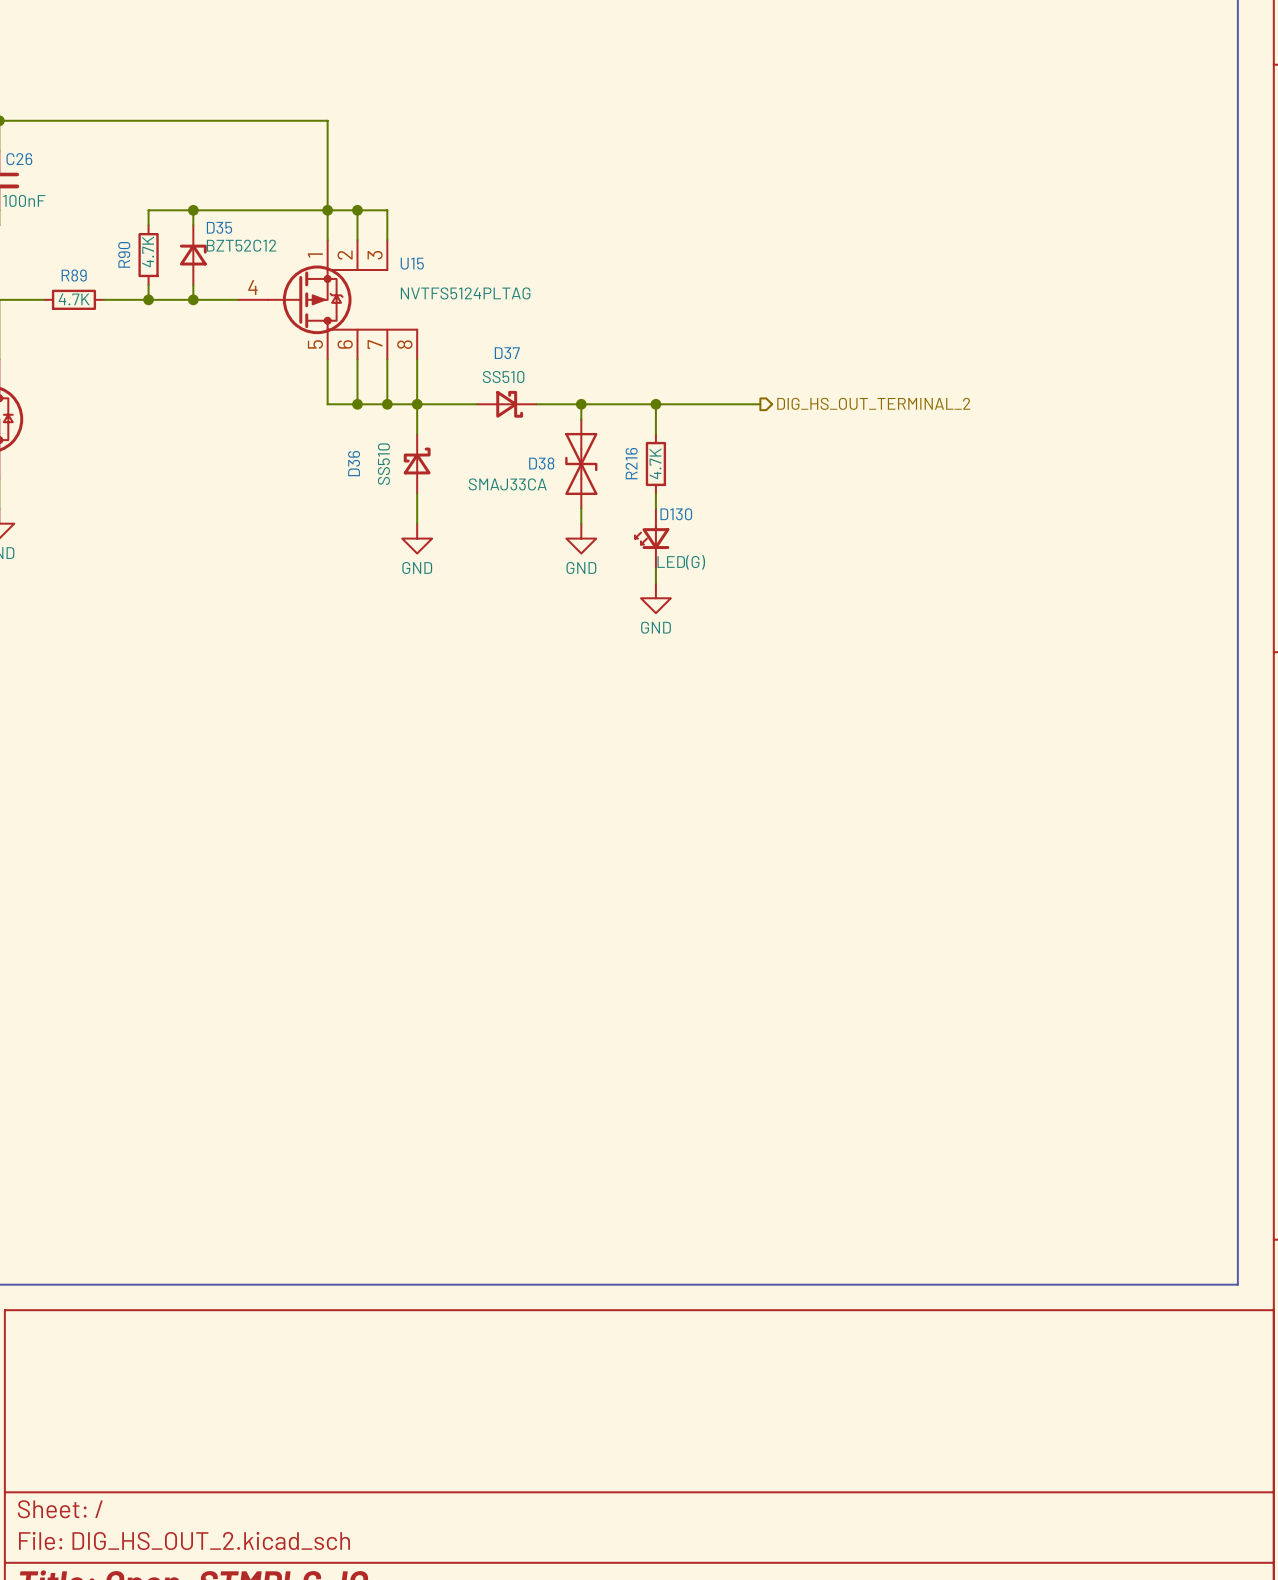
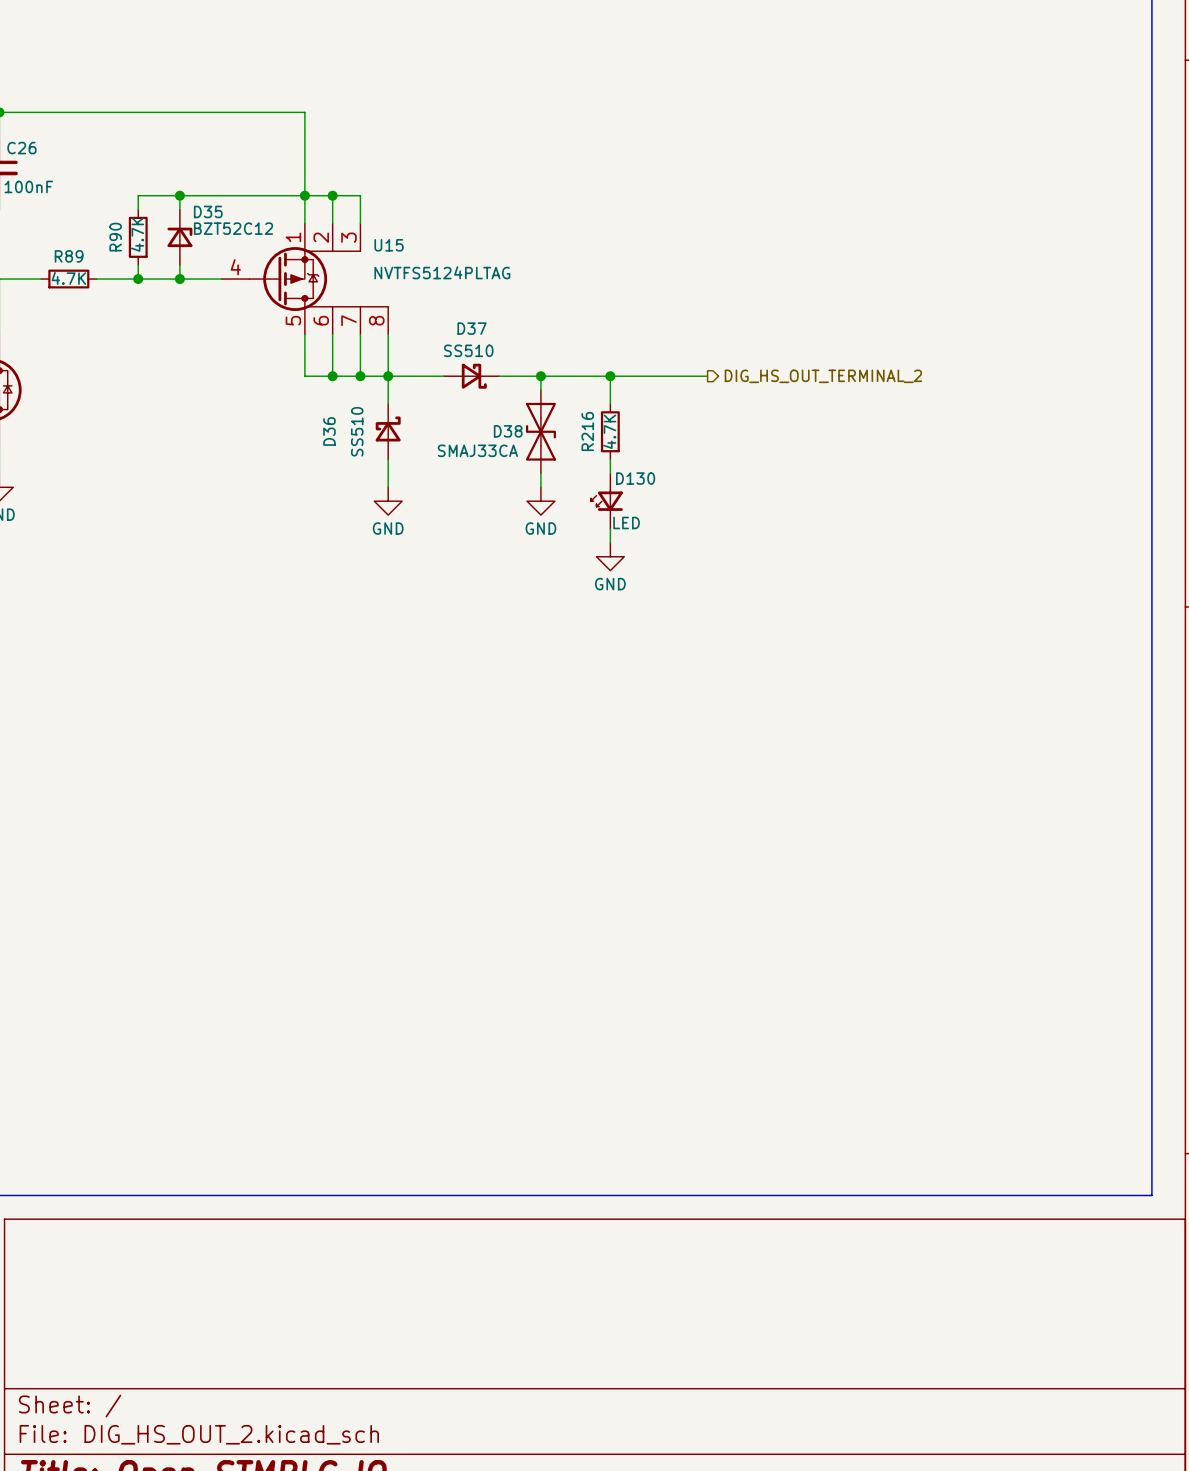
D130 value: LED(G) (681, 562) -> LED (626, 523)

